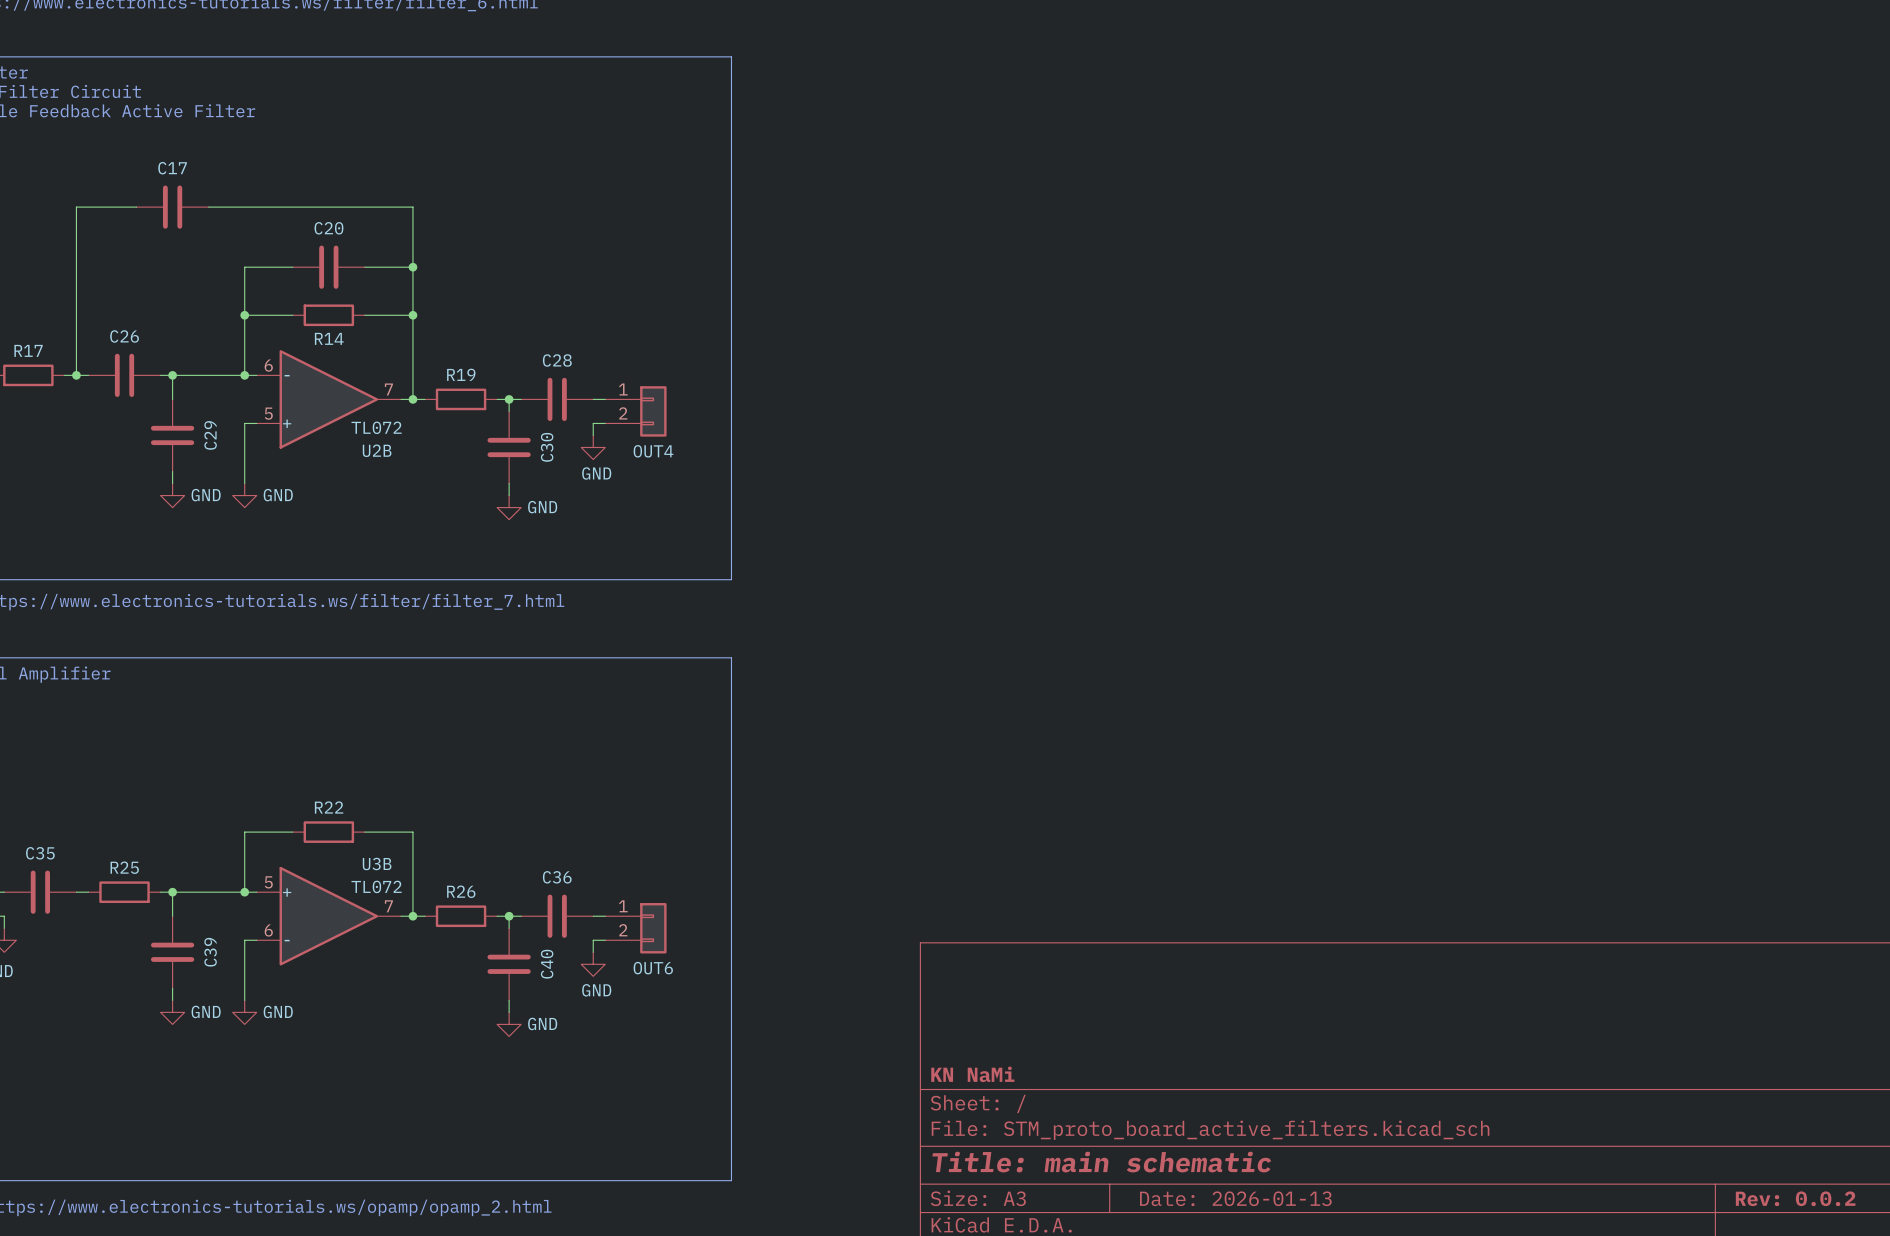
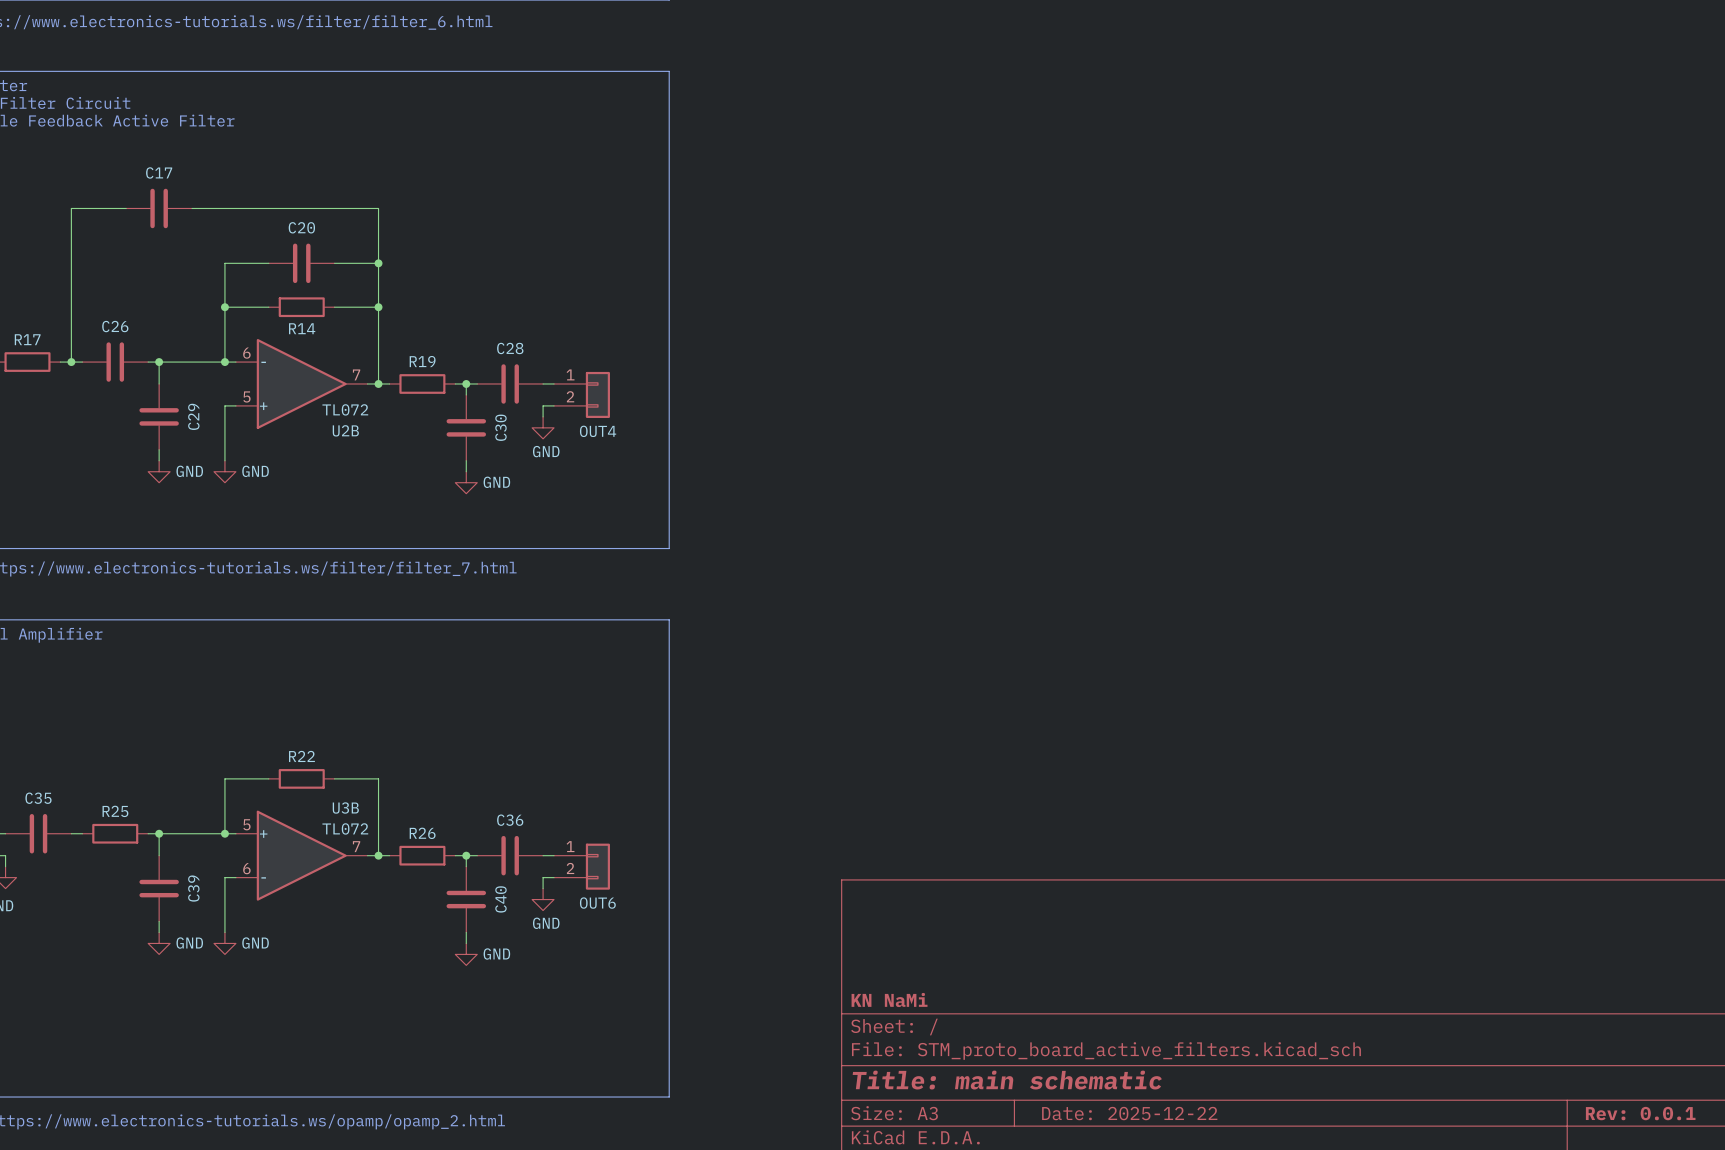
title block: Date: 2026-01-13 (1235, 1198) -> Date: 2025-12-22 (1129, 1113)
title block: Rev: 0.0.2 (1795, 1198) -> Rev: 0.0.1 (1640, 1113)

